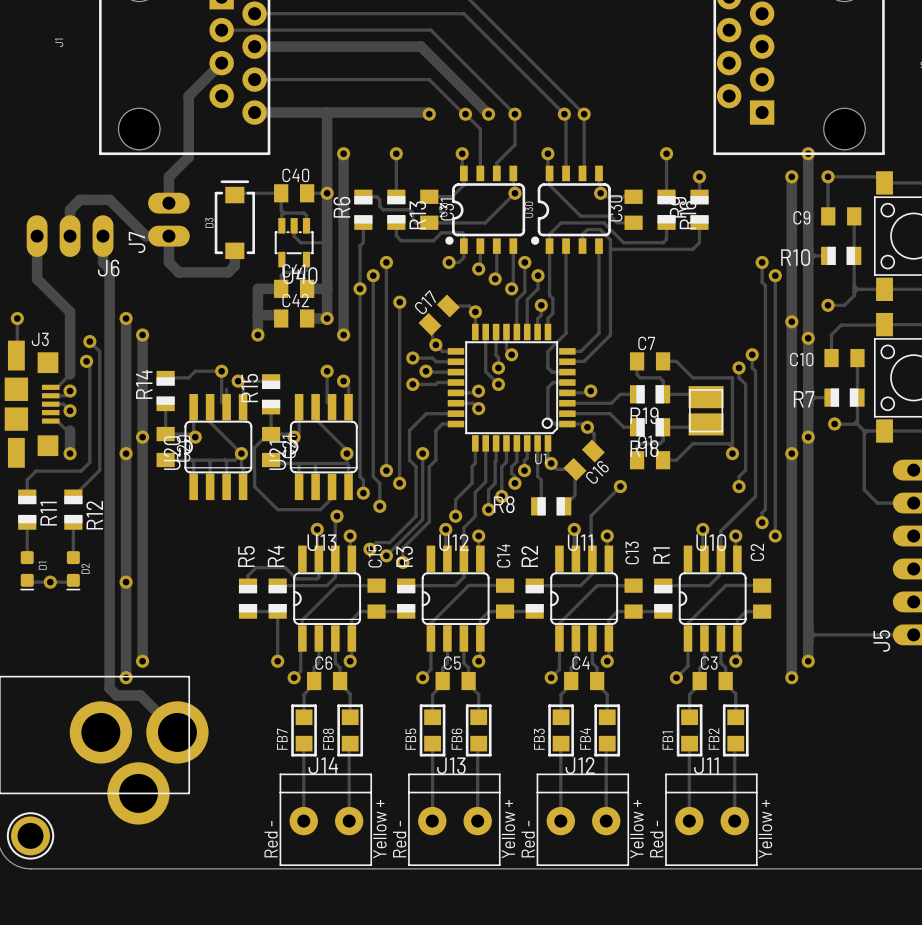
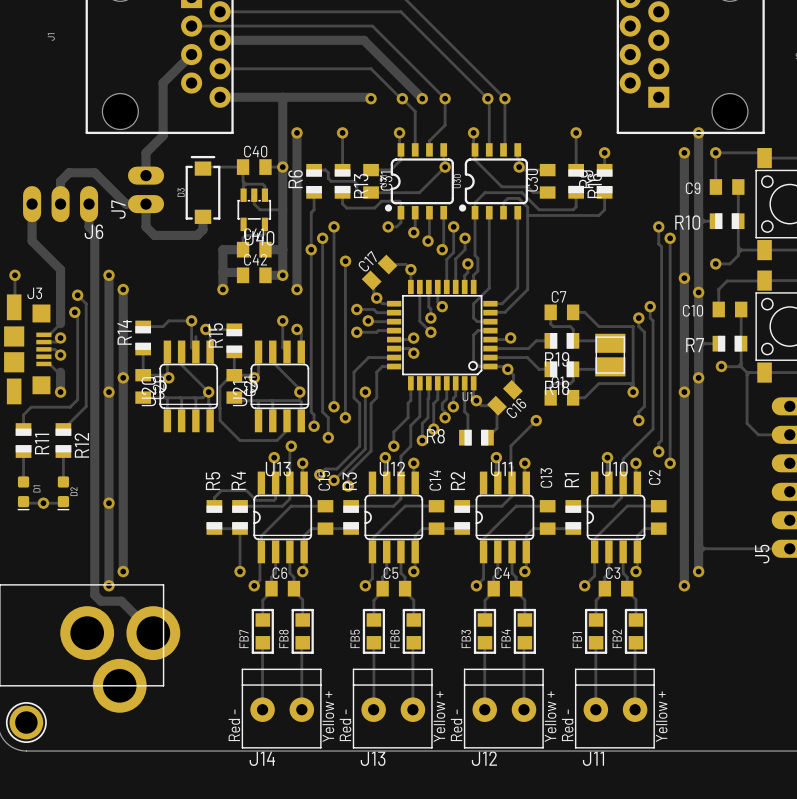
J14 name position: J14 (323, 765) -> J14 (262, 758)
J13 name position: J13 (451, 765) -> J13 (373, 758)
J12 name position: J12 (580, 765) -> J12 (484, 758)
J11 name position: J11 (706, 765) -> J11 (593, 758)

